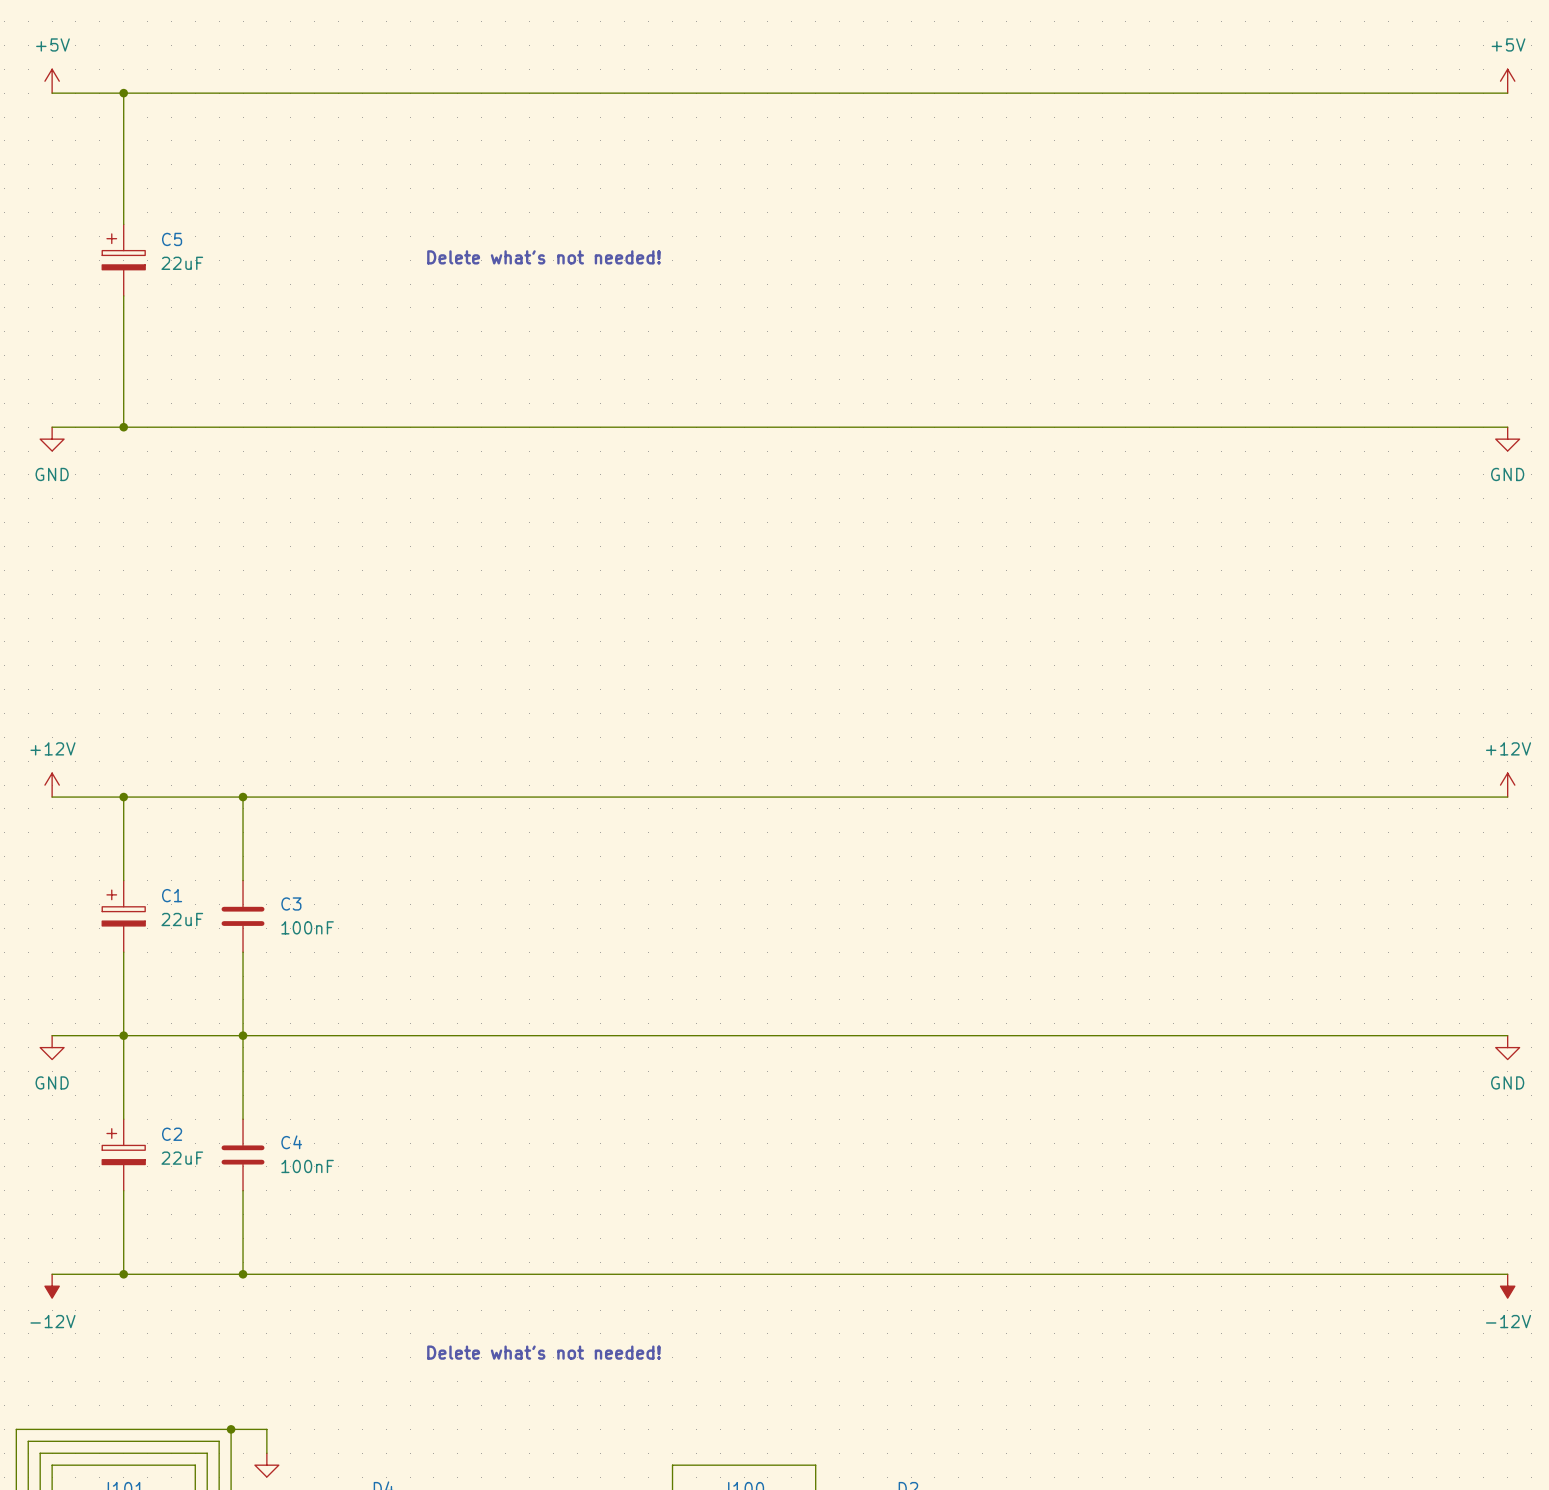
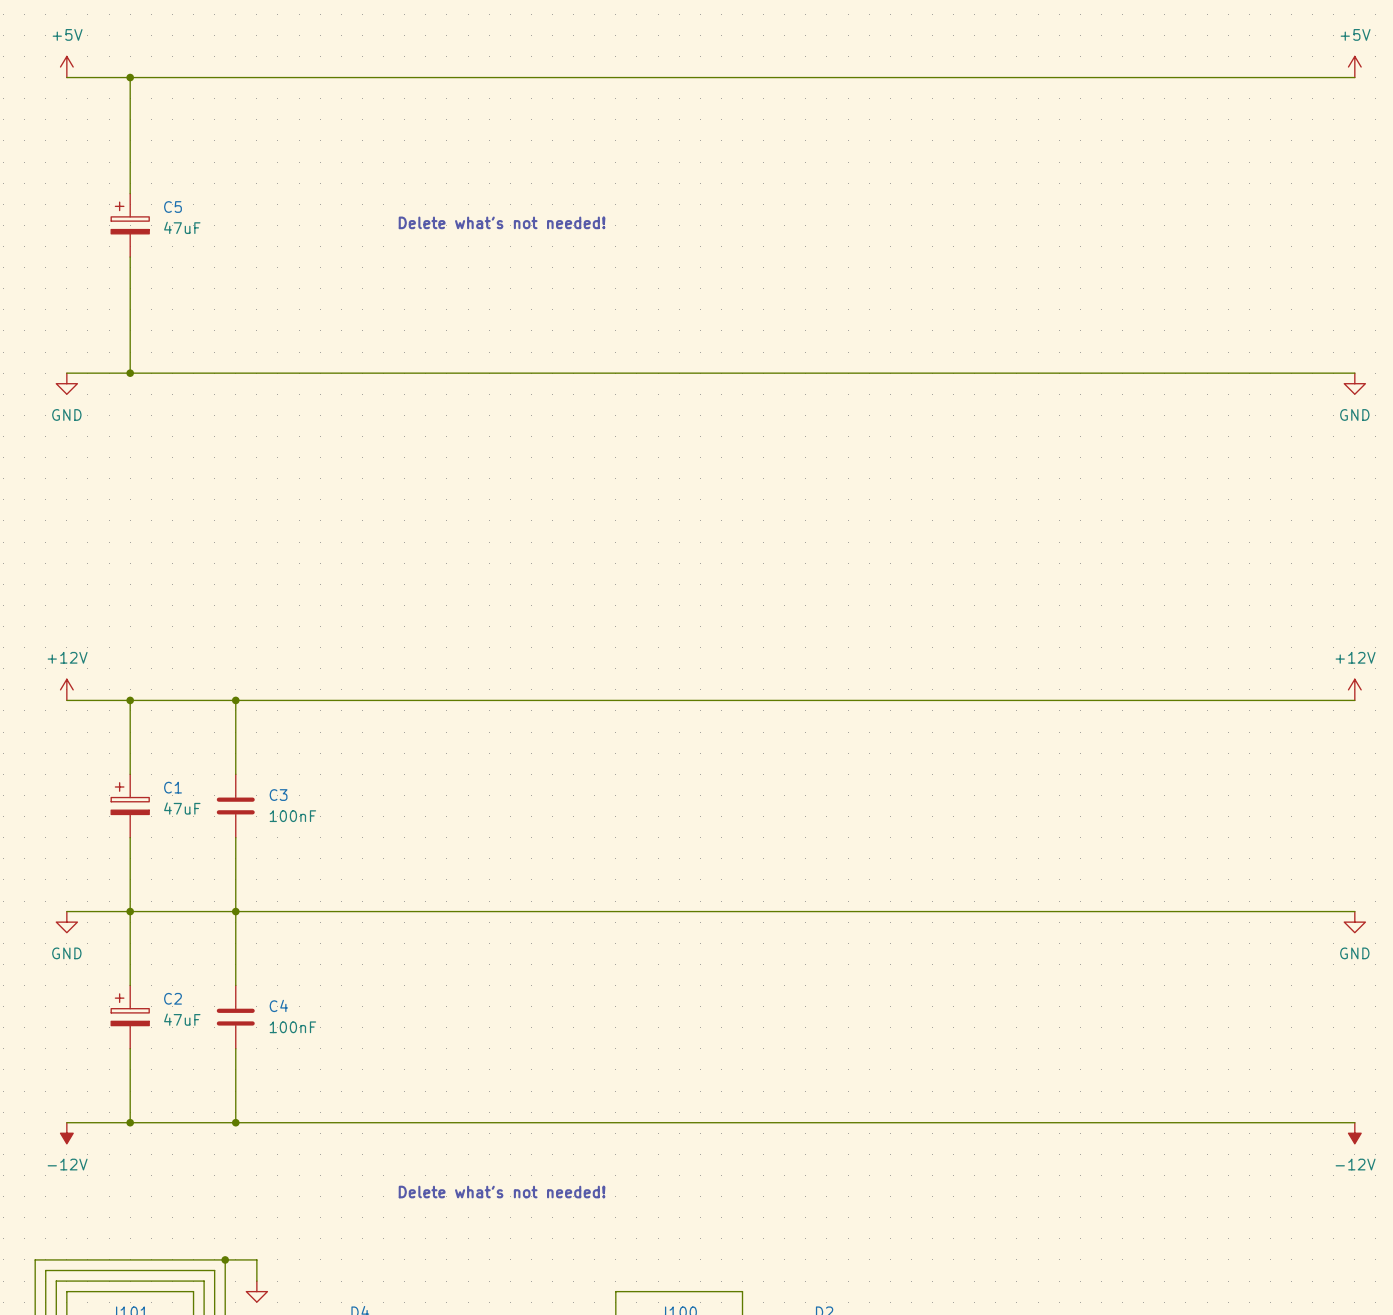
C5 value: 22uF (182, 263) -> 47uF (182, 227)
C1 value: 22uF (182, 919) -> 47uF (182, 808)
C2 value: 22uF (182, 1158) -> 47uF (182, 1019)

